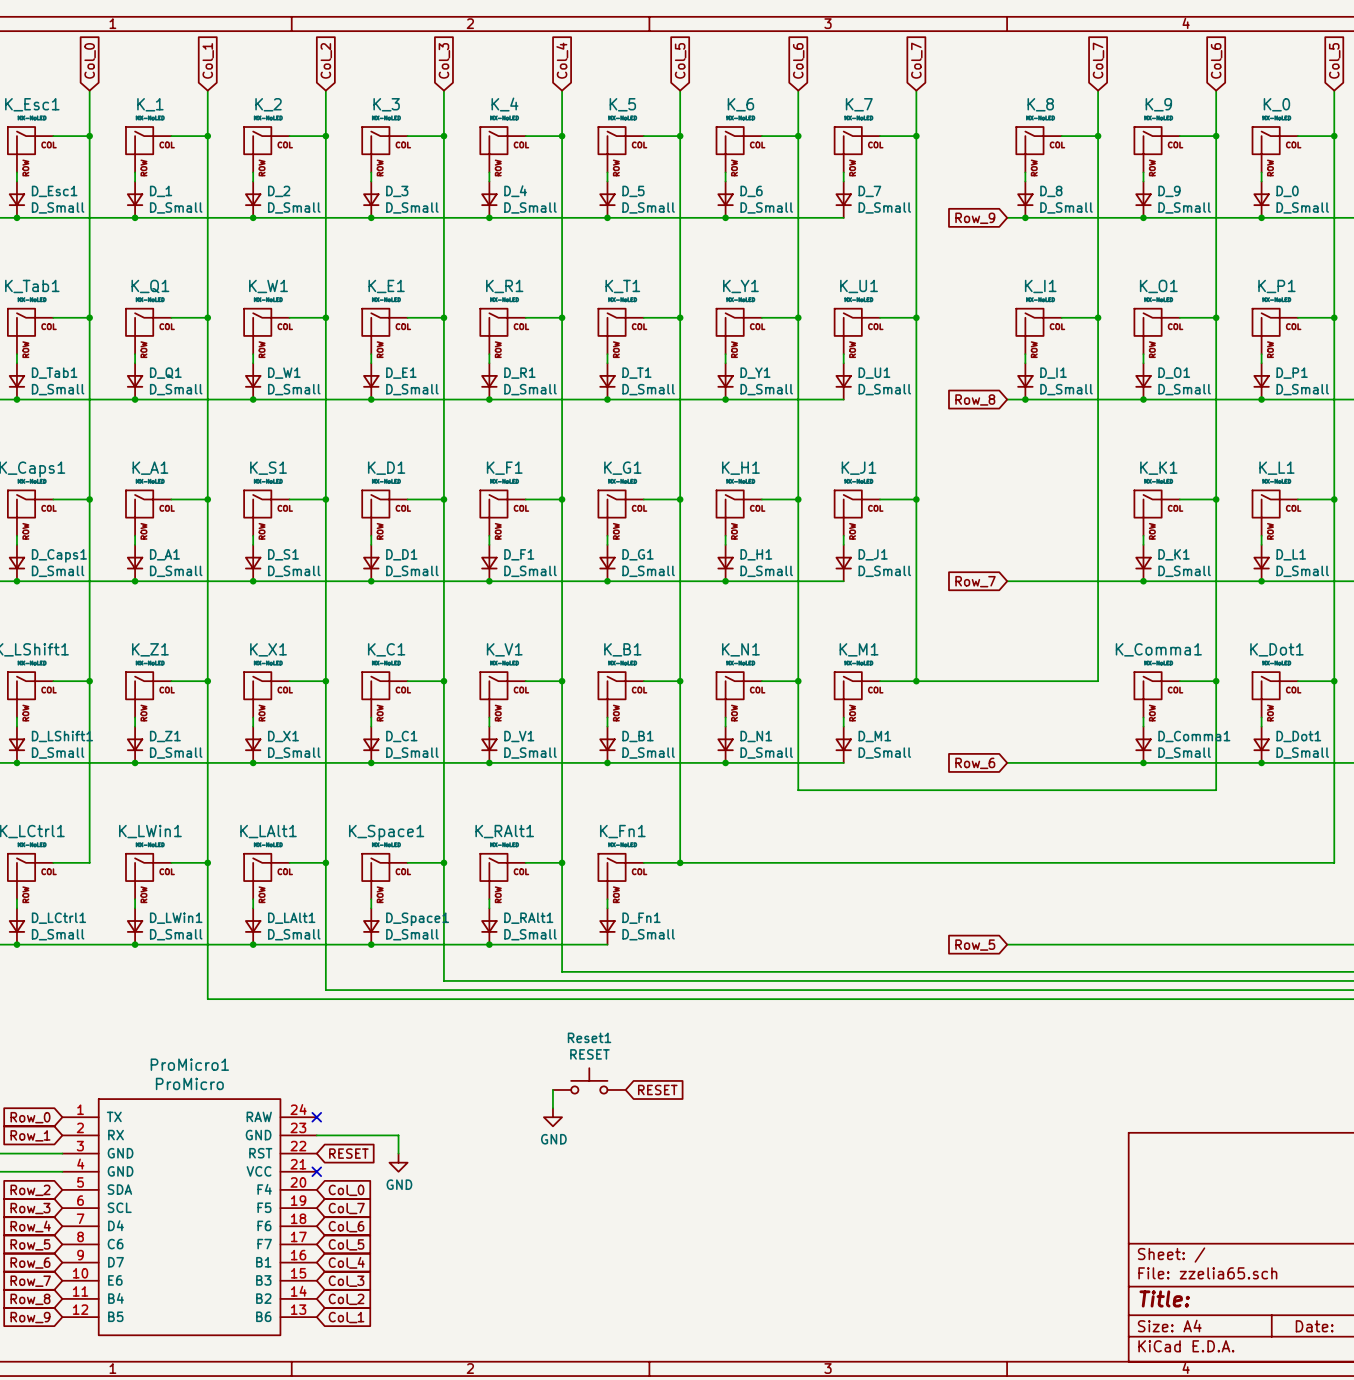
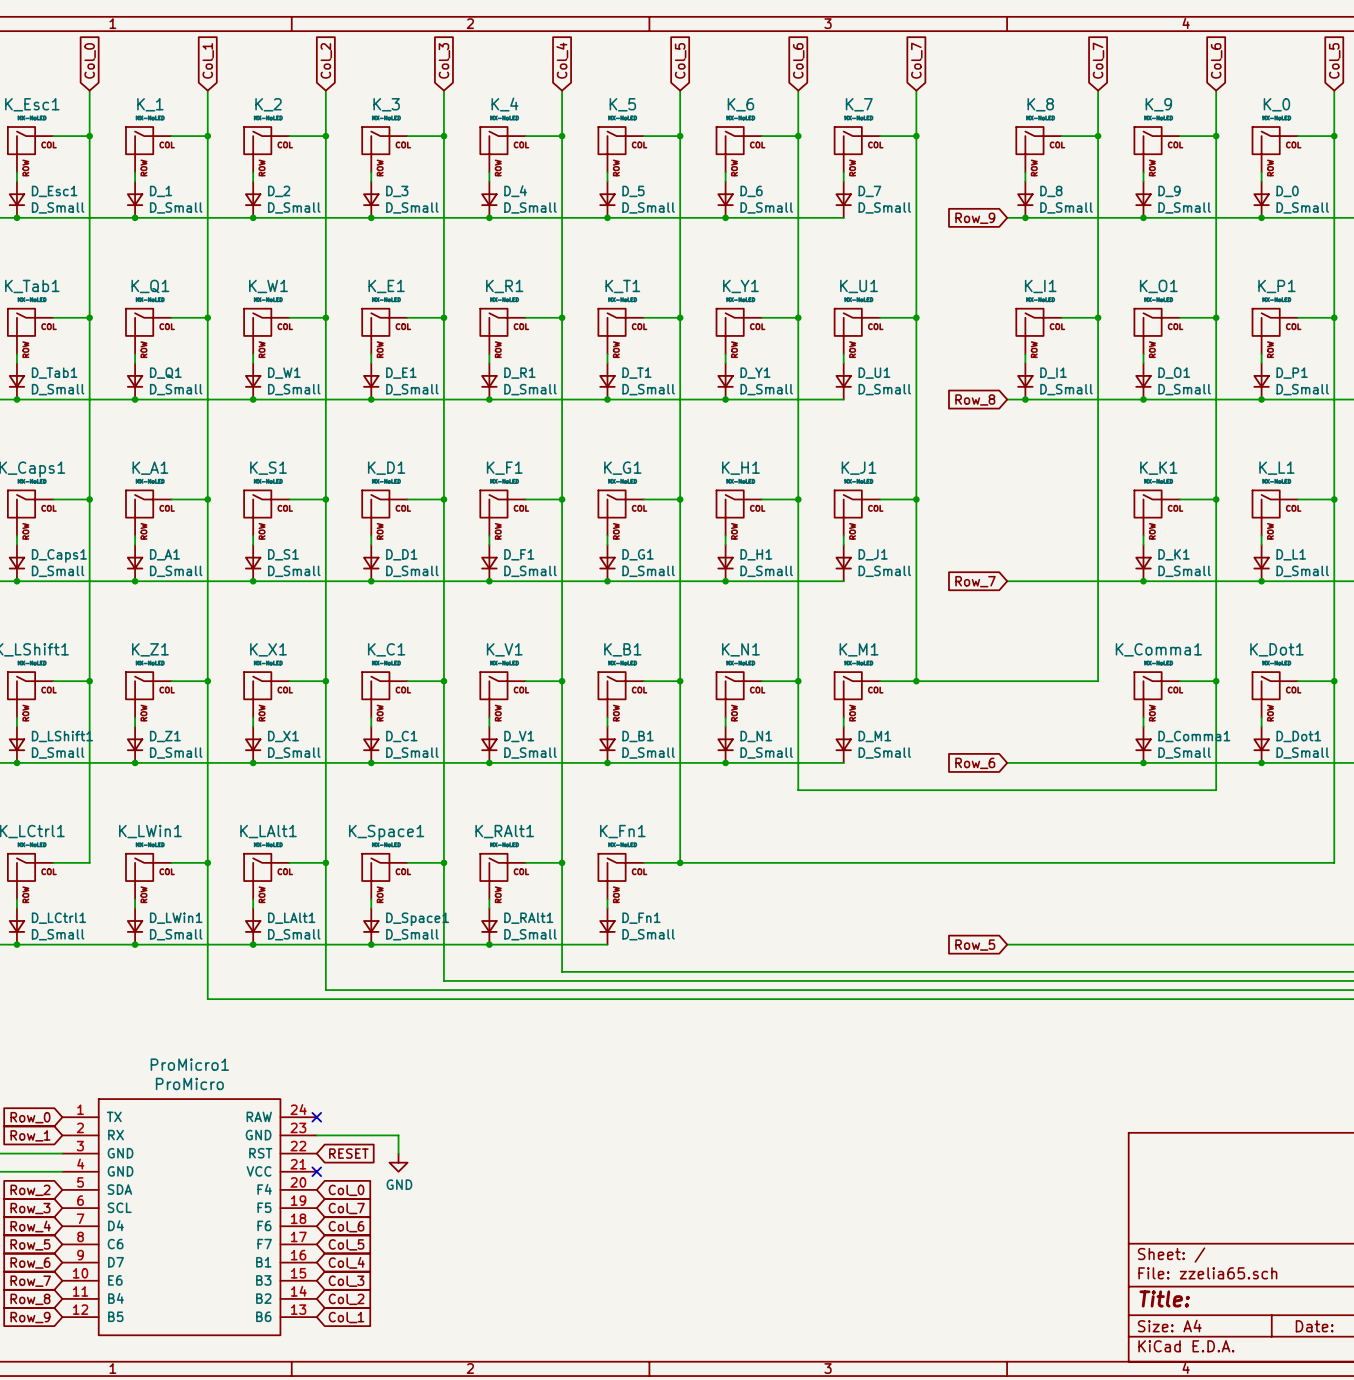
Reset1: RESET (589, 1080) -> none
wire: (552, 1089) (552, 1108) -> none
global label: RESET (657, 1089) -> none
power symbol: GND (552, 1117) -> none

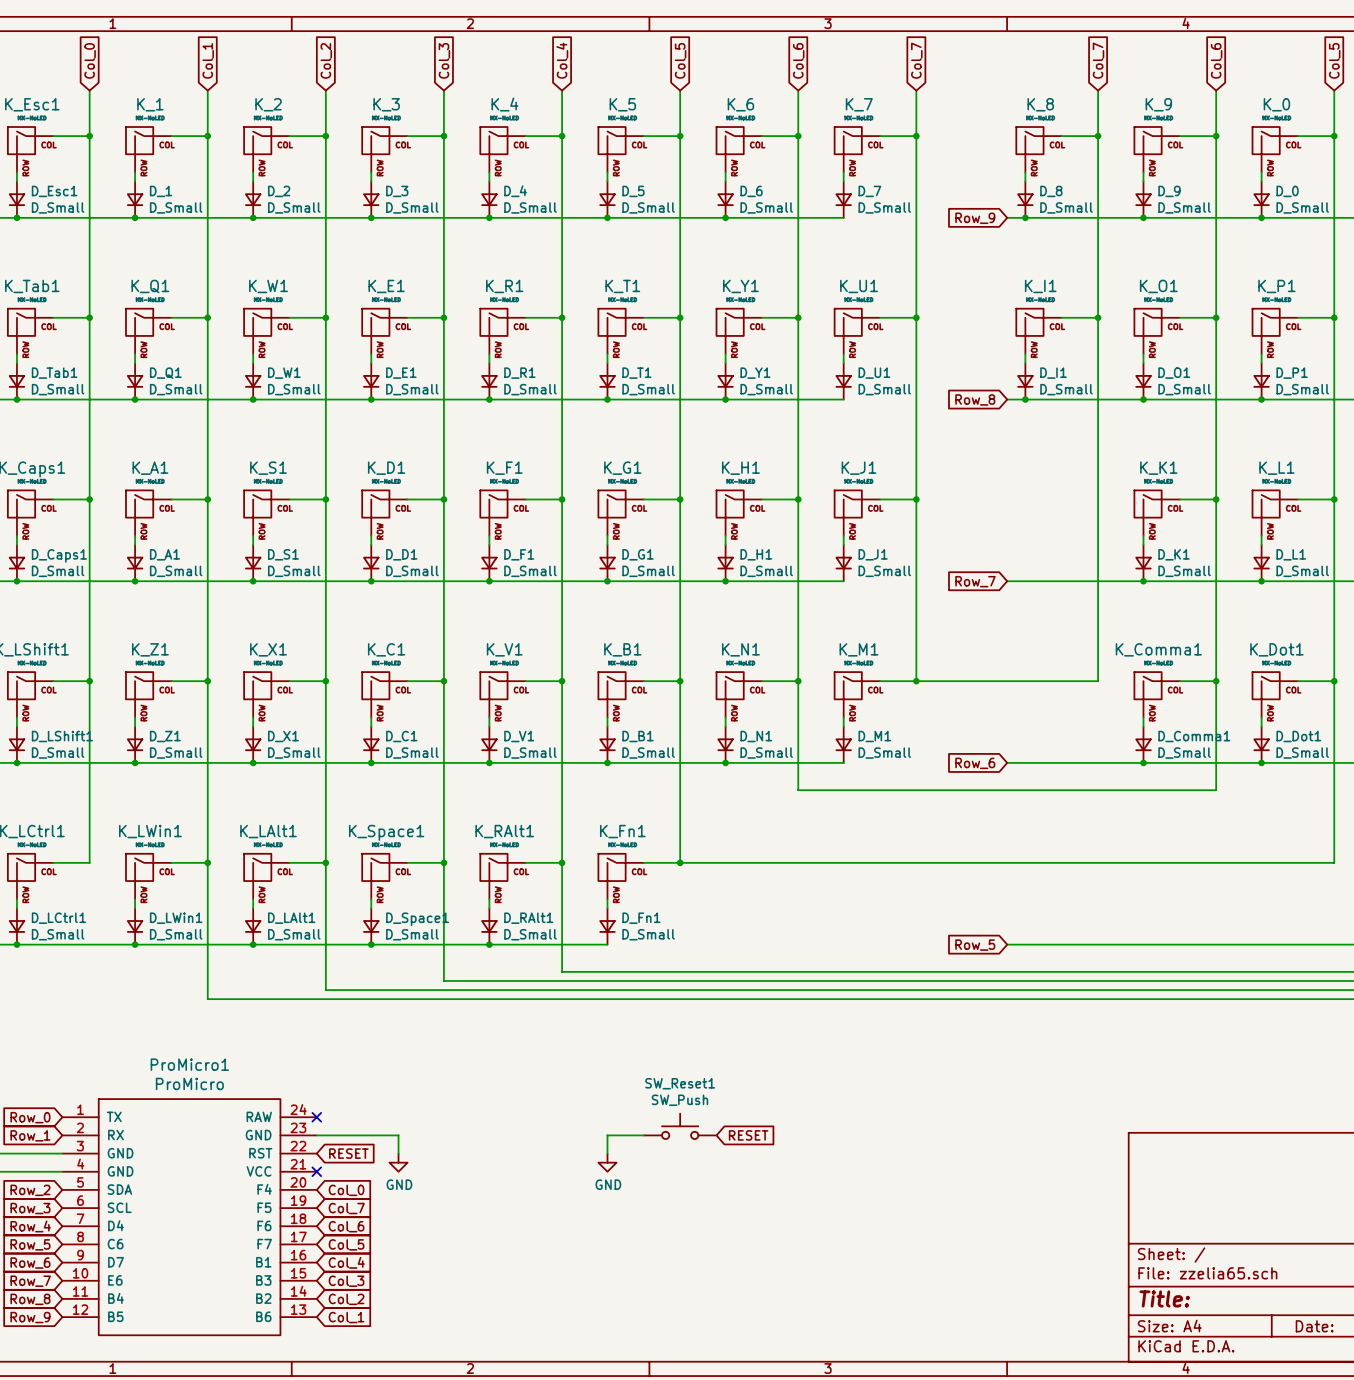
SW_Reset1: none -> SW_Push (680, 1126)
wire: none -> (643, 1135) (607, 1135) (607, 1153)
global label: none -> RESET (748, 1135)
power symbol: none -> GND (607, 1162)

